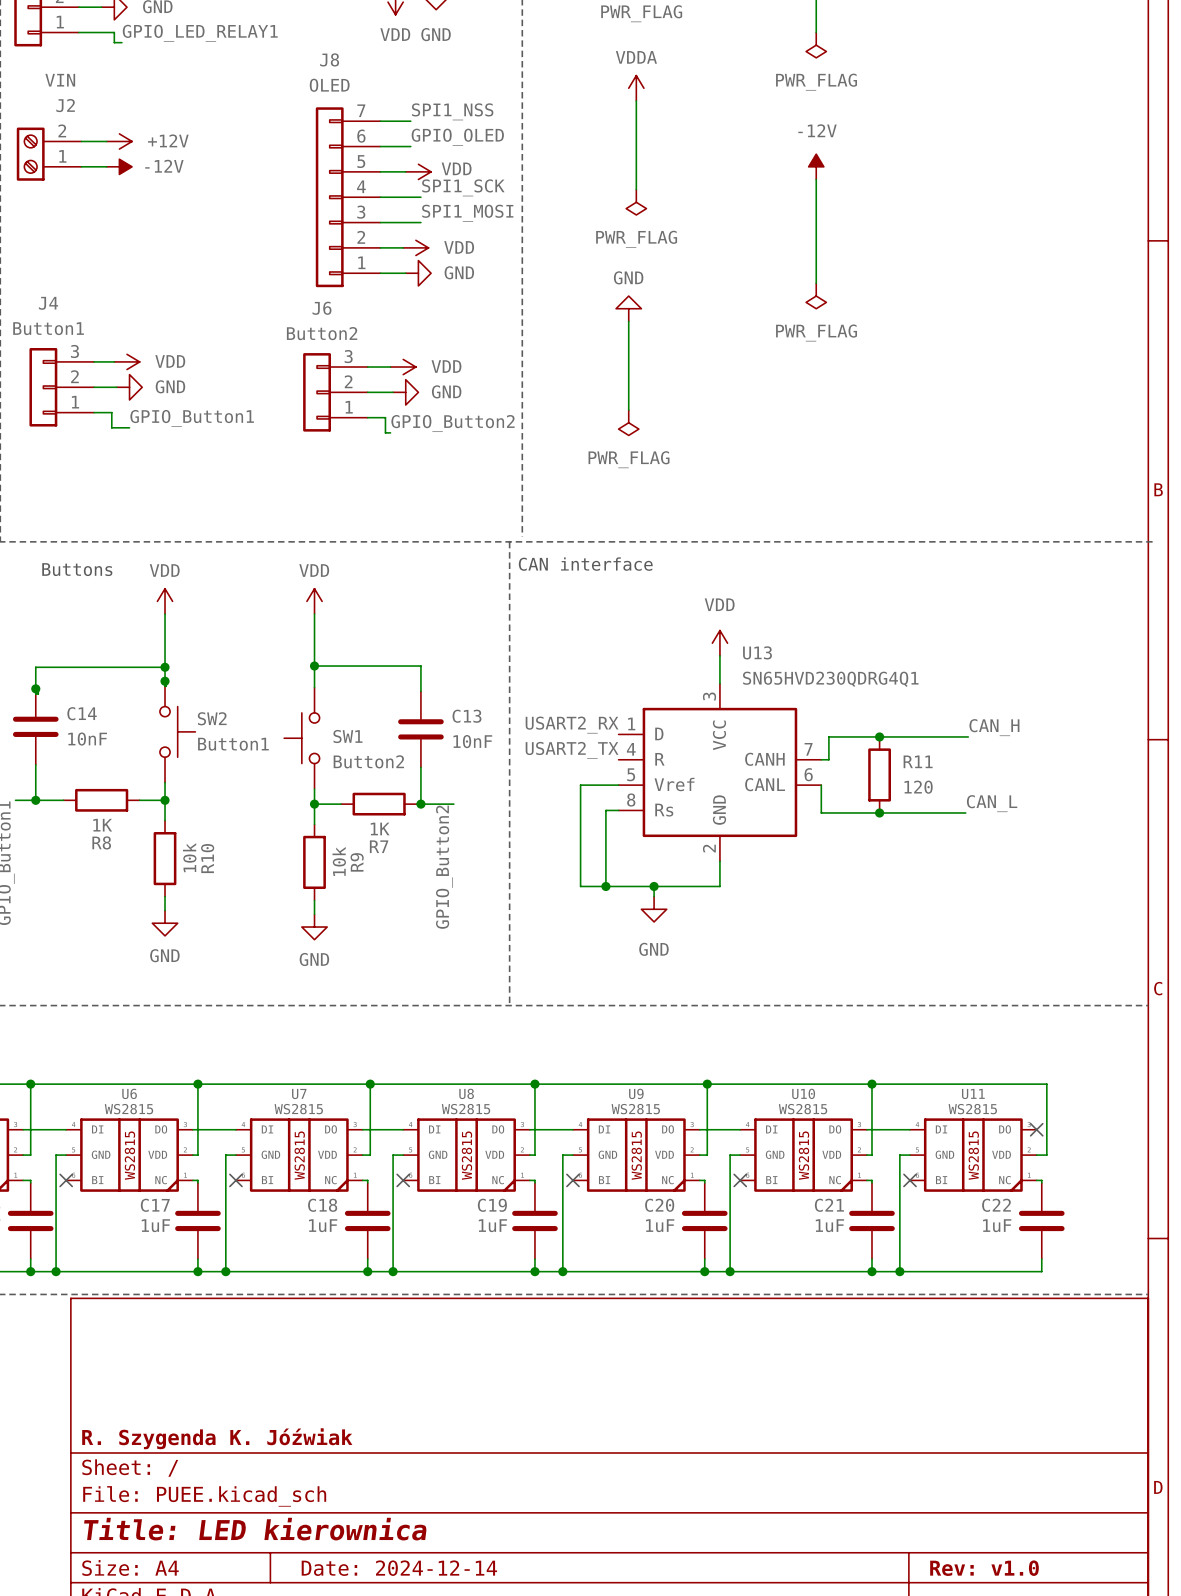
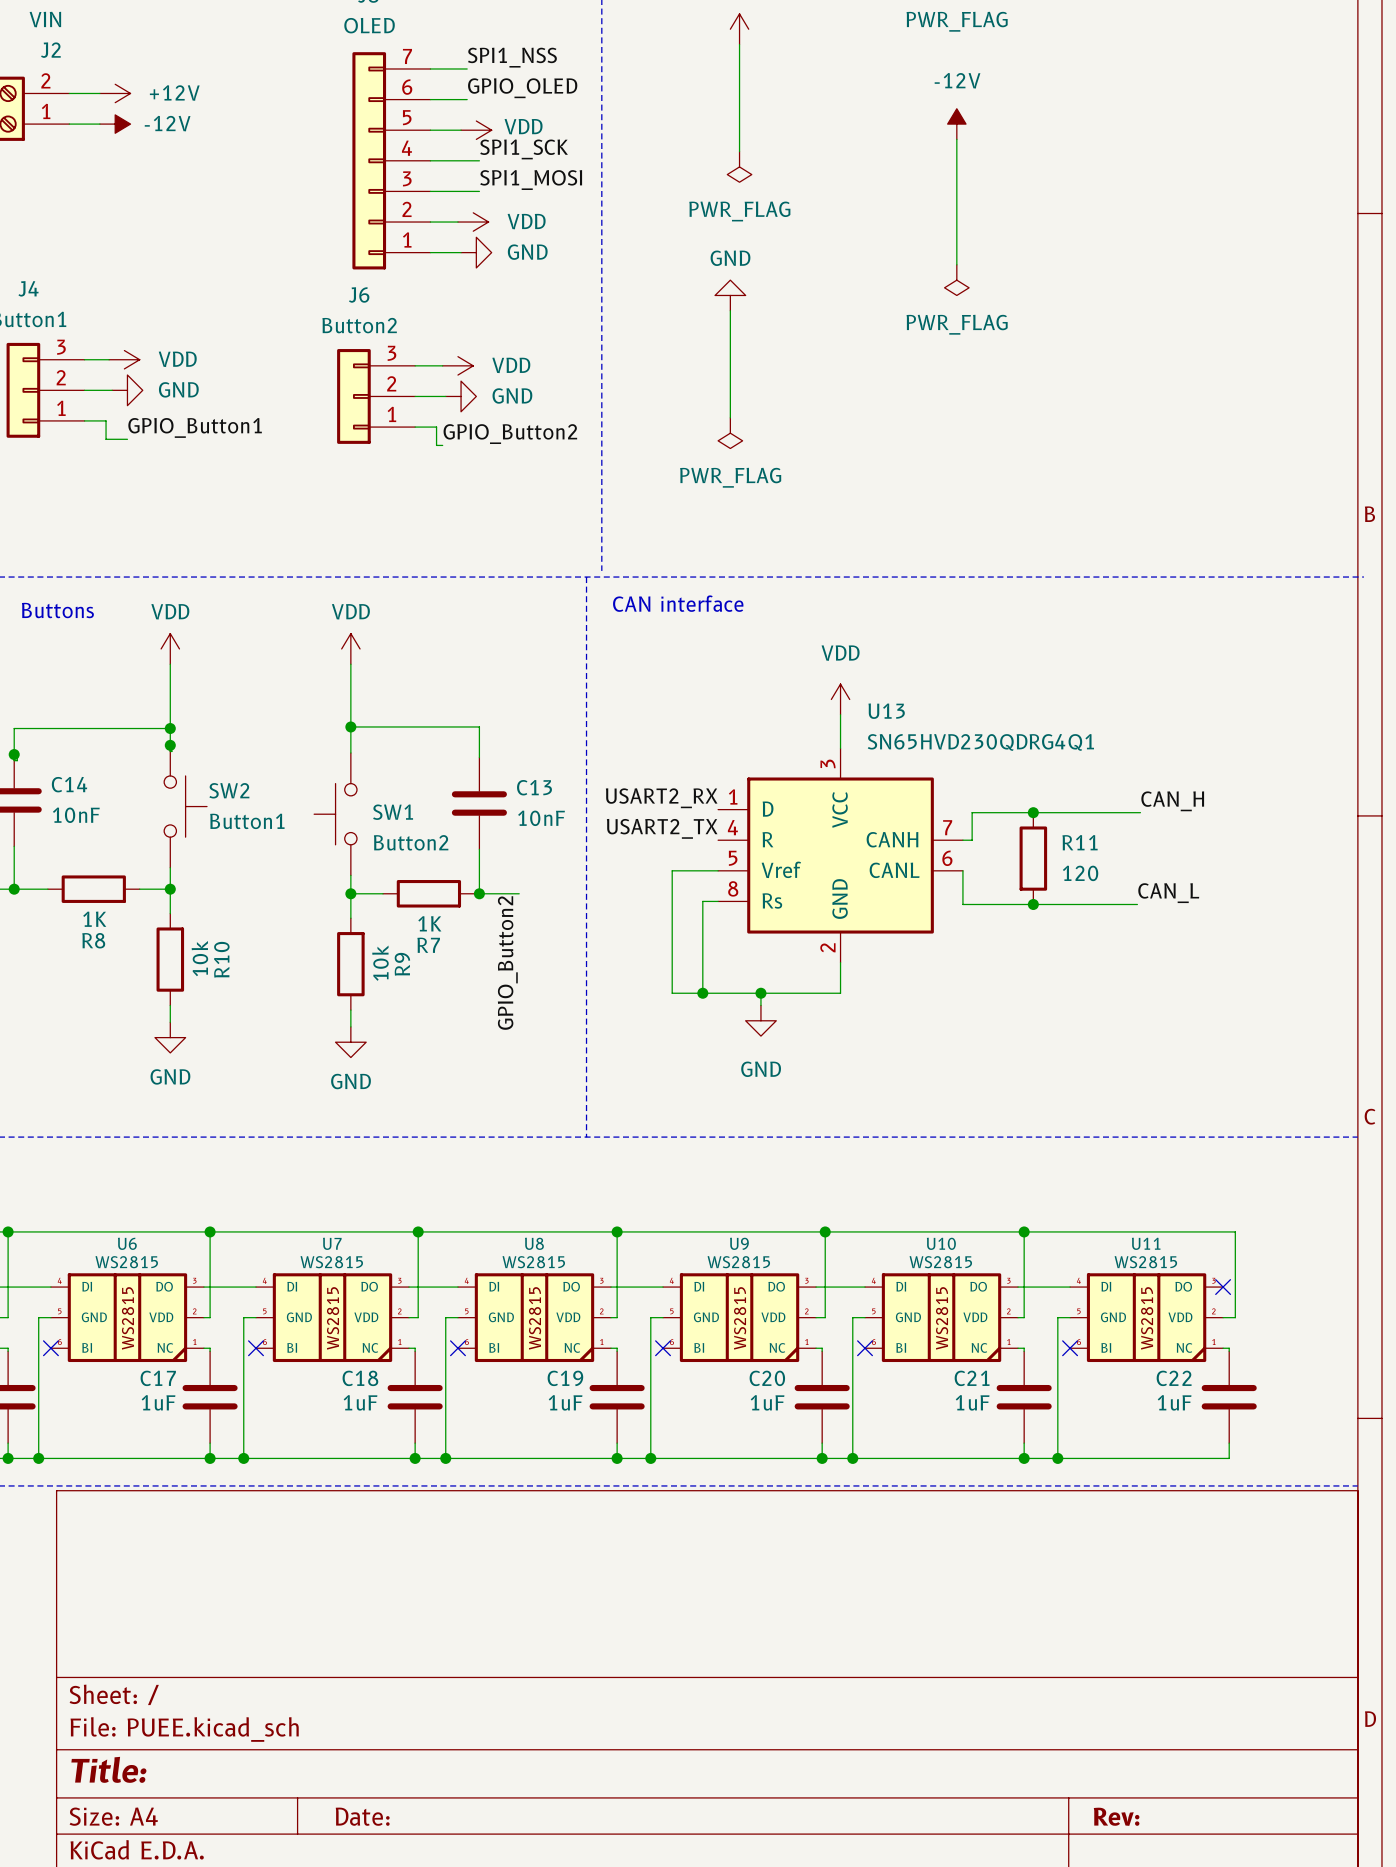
title block: R. Szygenda K. Jóźwiak (217, 1438) -> none
title block: Title: LED kierownica (255, 1529) -> Title: (108, 1769)
title block: Date: 2024-12-14 (399, 1568) -> Date: (362, 1816)
title block: Rev: v1.0 (984, 1568) -> Rev: (1116, 1816)

